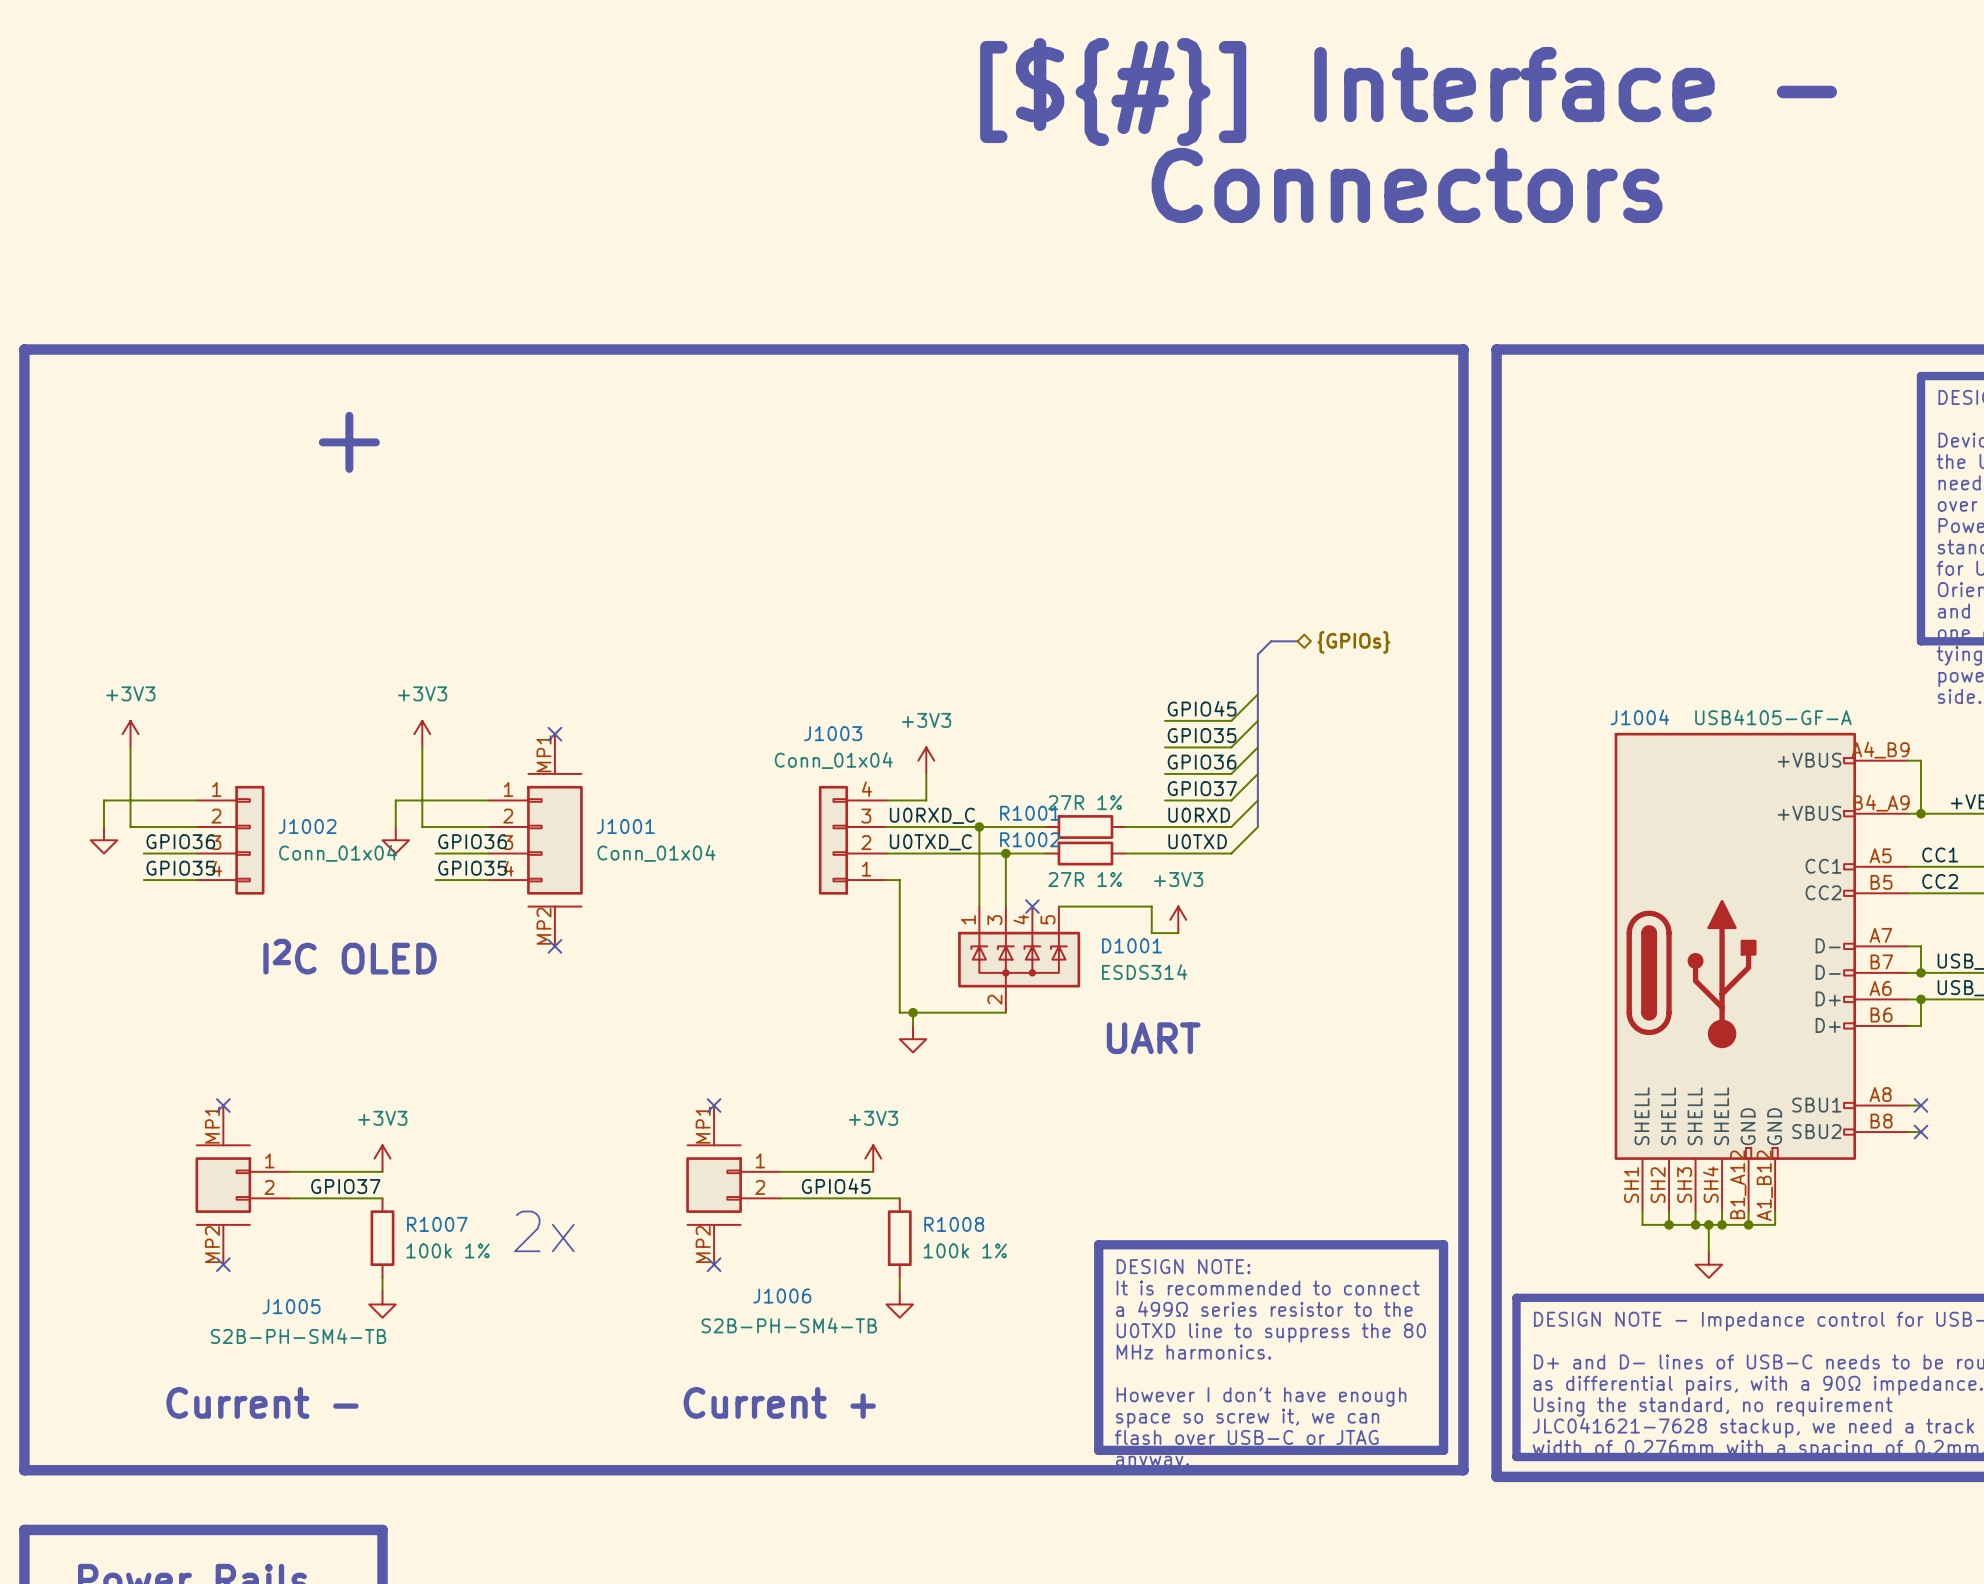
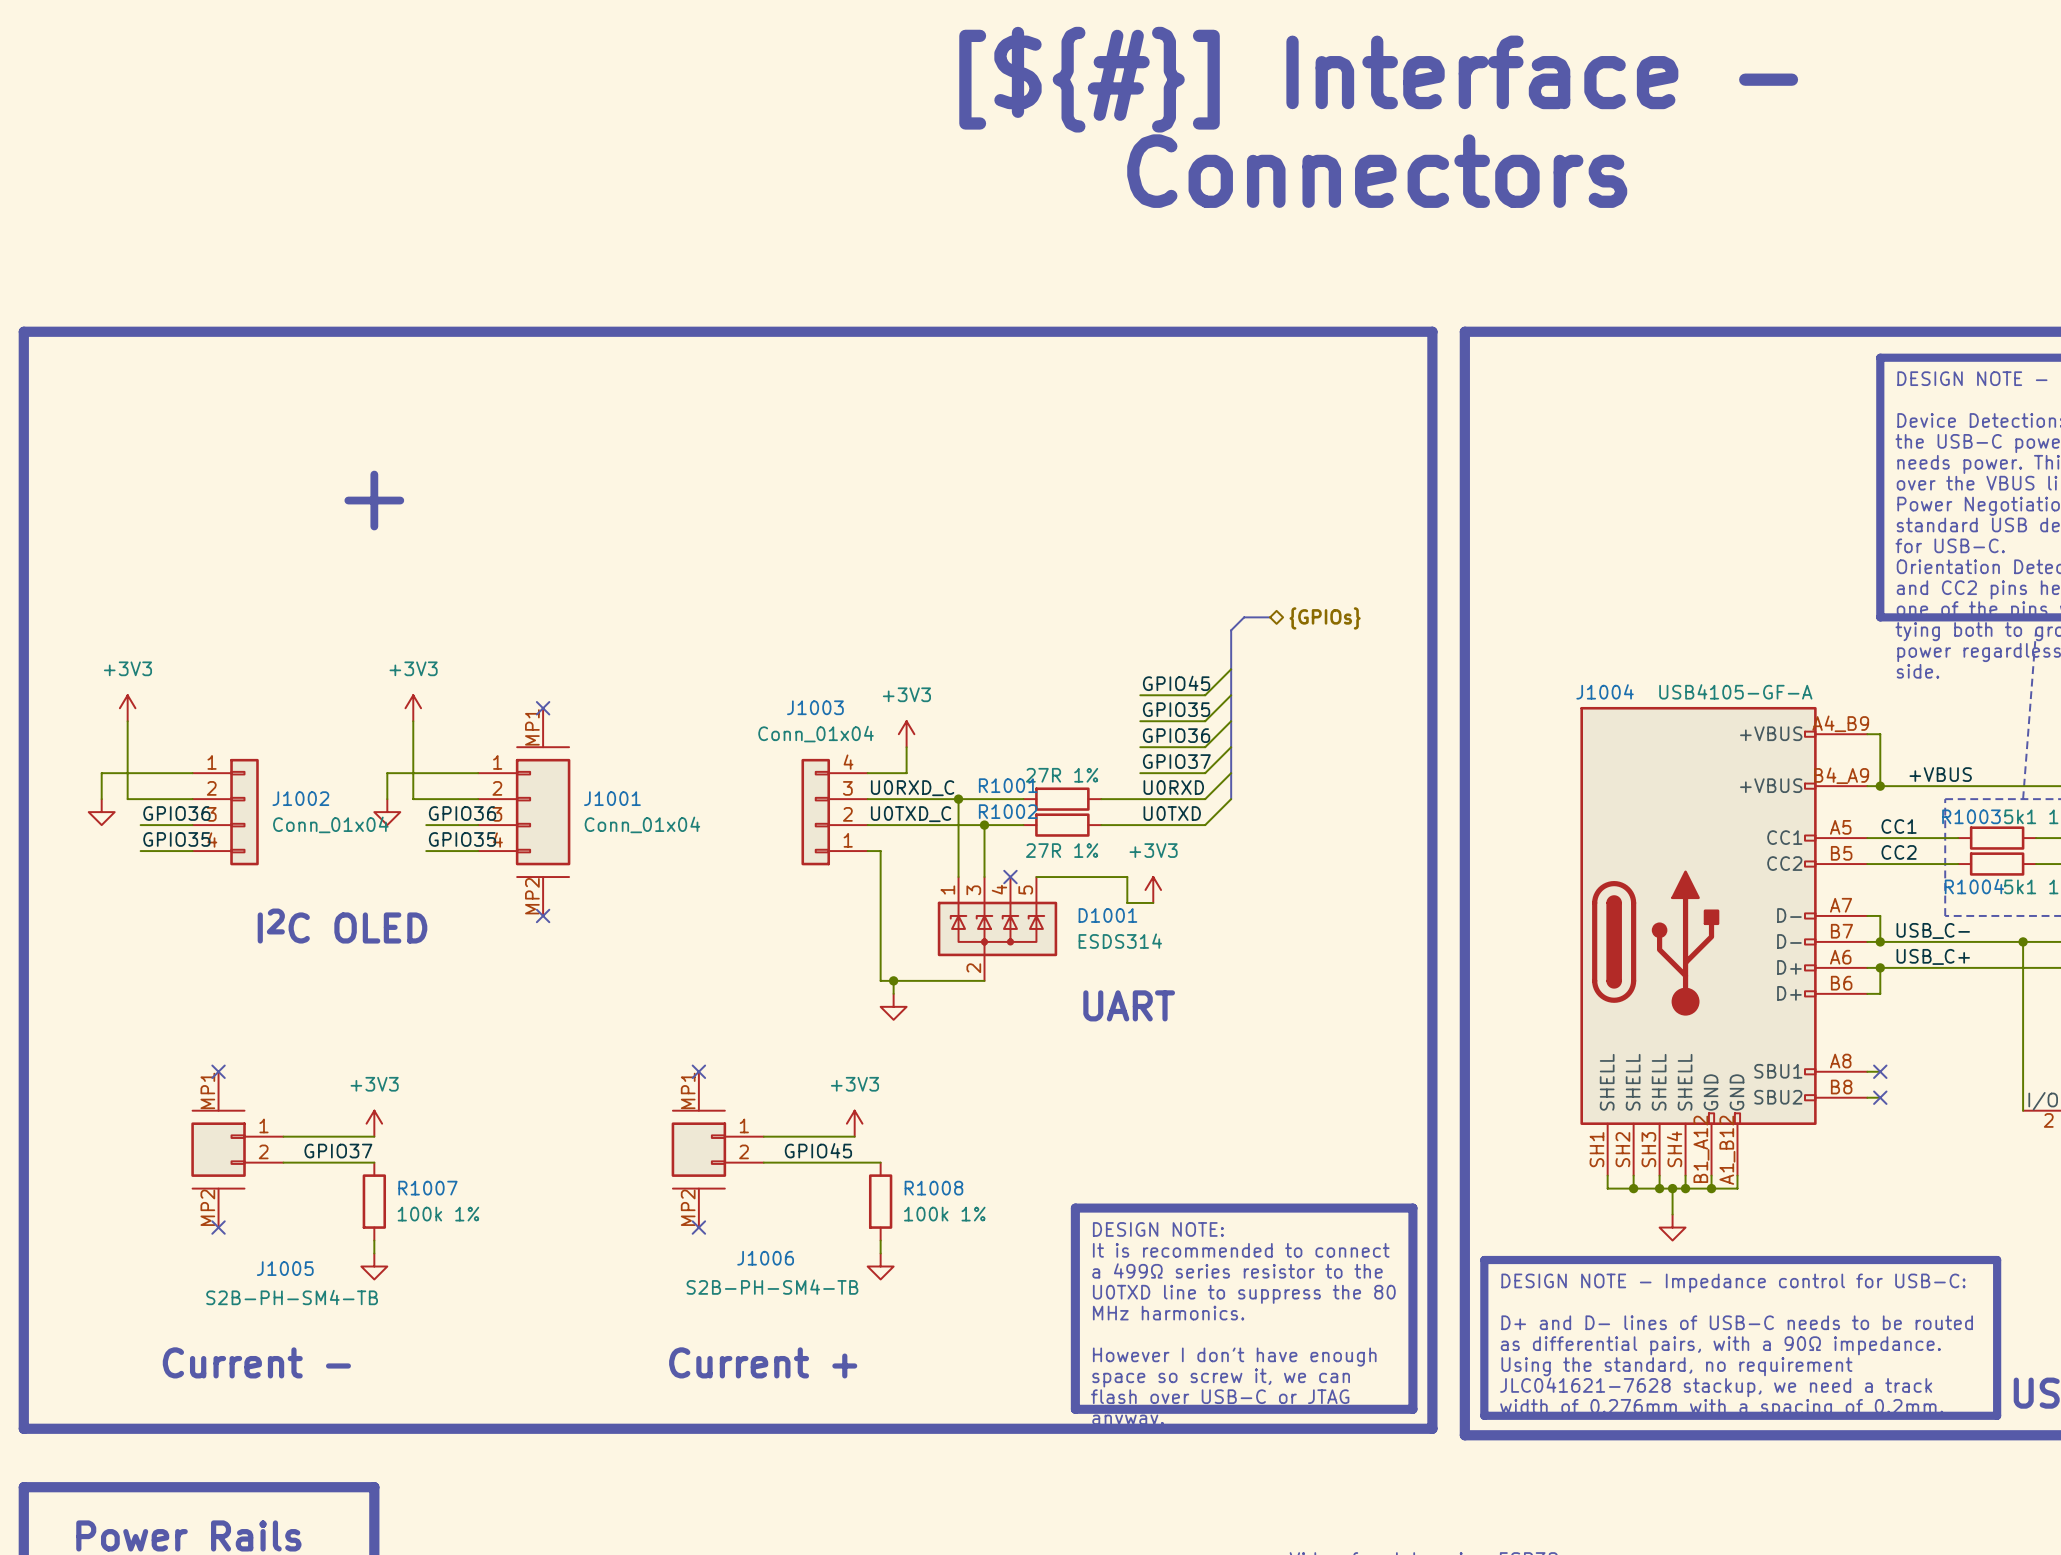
line: (349, 415) (349, 468) -> (374, 474) (374, 526)
line: (322, 442) (375, 442) -> (348, 500) (400, 500)
text: 2x (544, 1231) -> none

